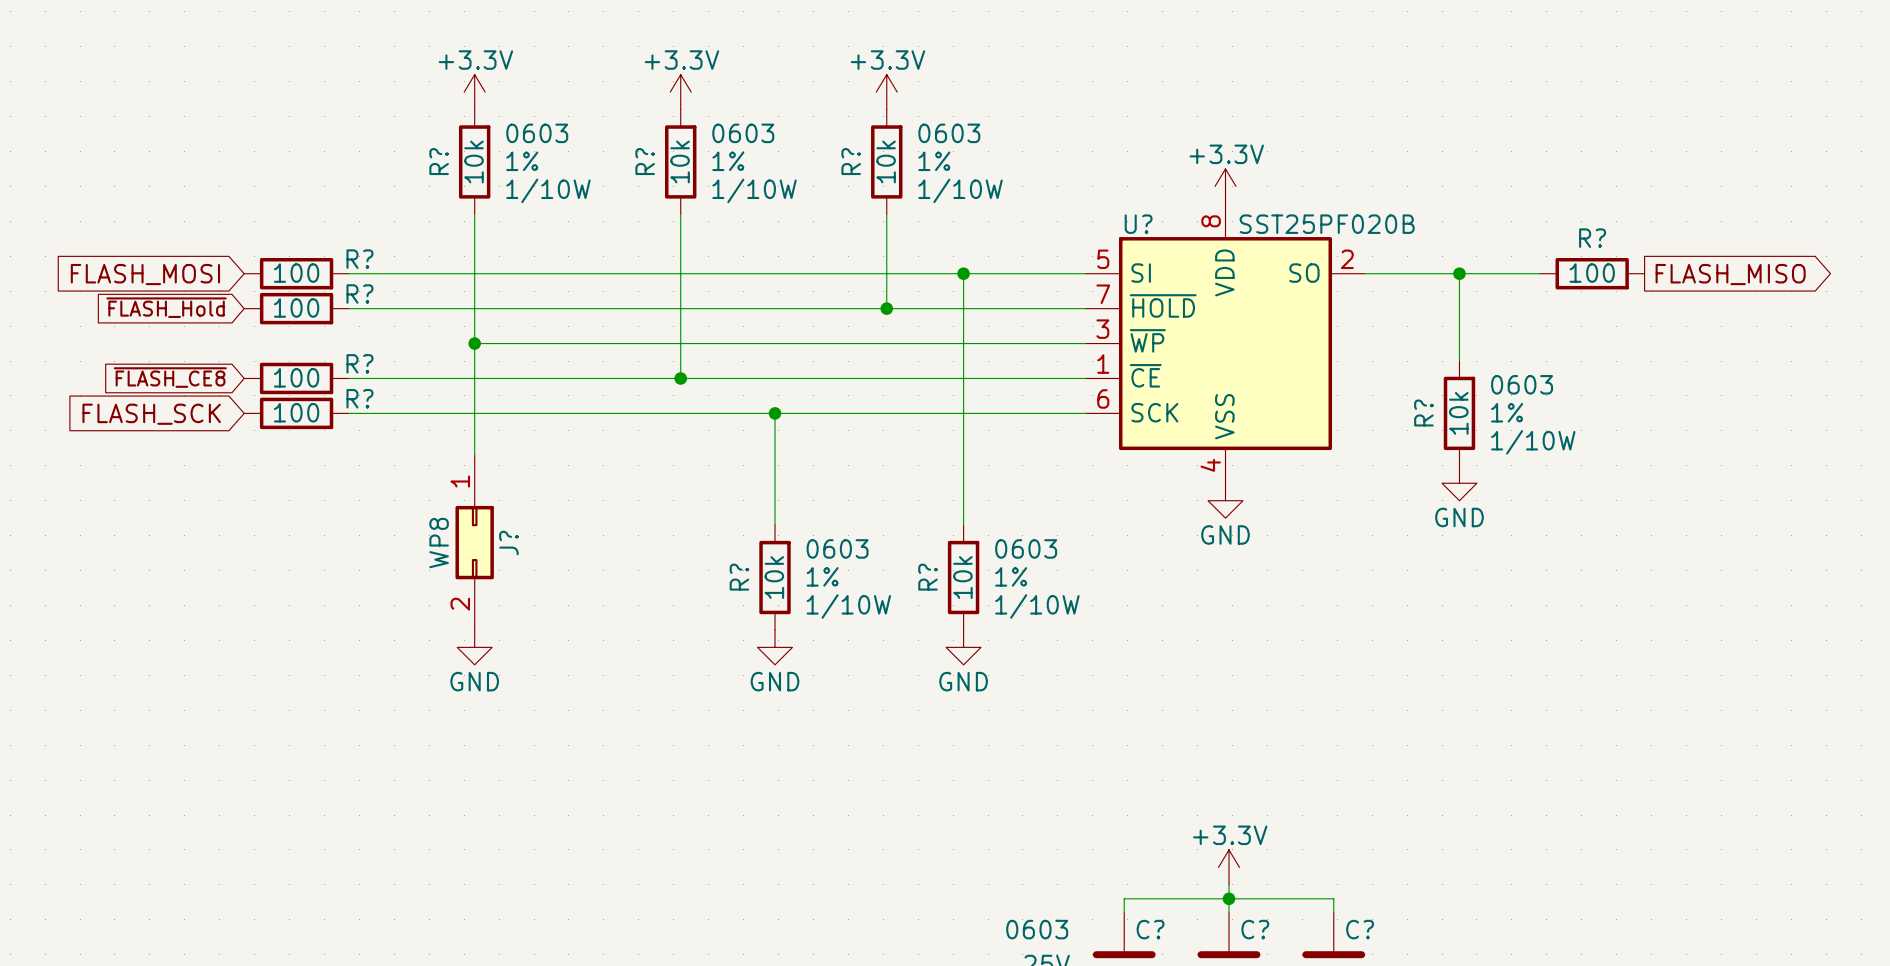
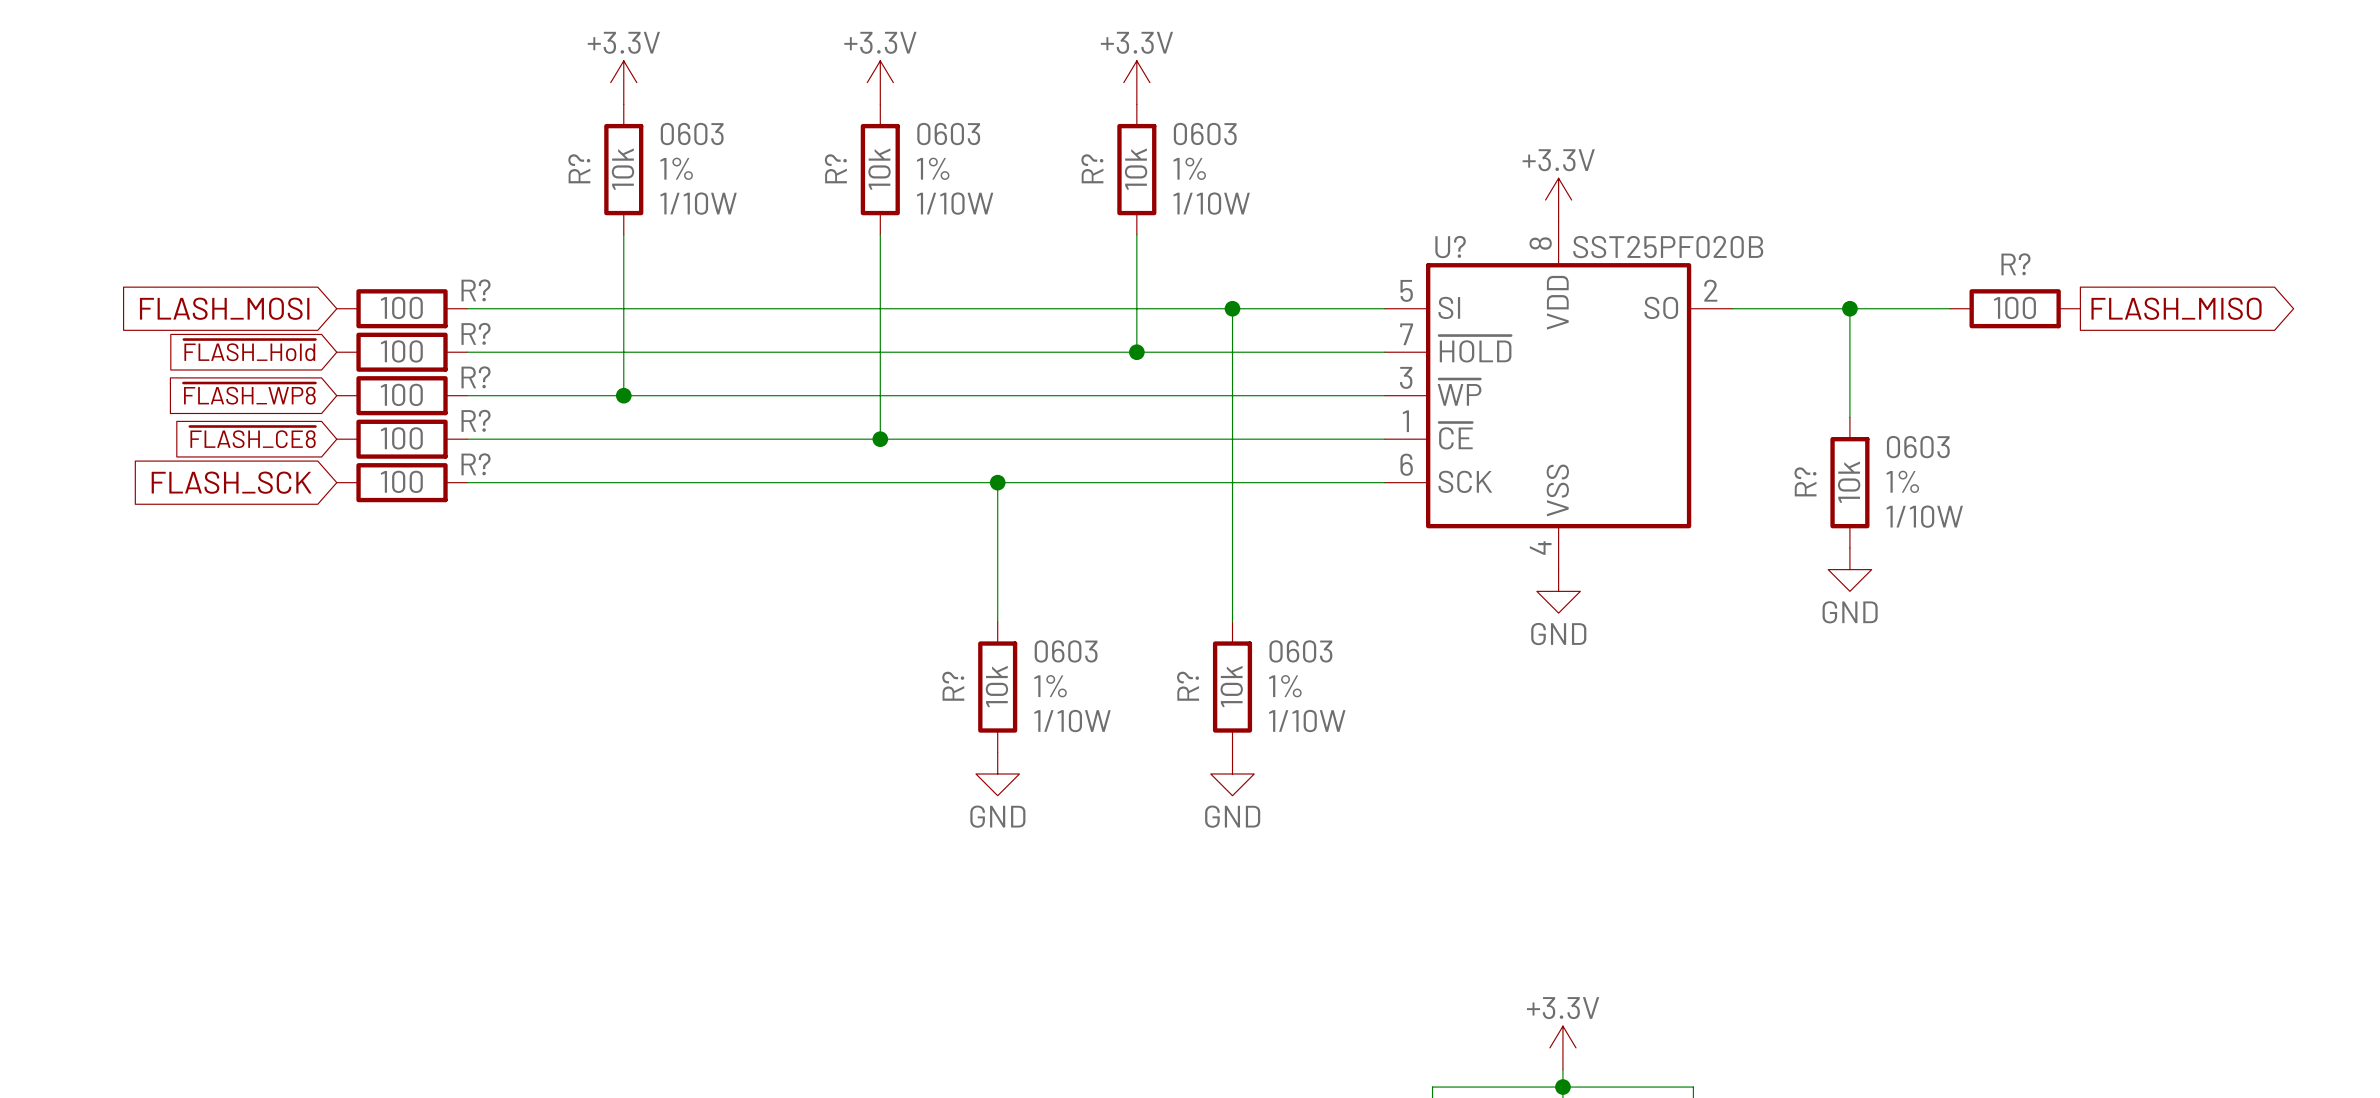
global label: none -> ~{FLASH_WP8} (249, 393)
R?: none -> 100 (402, 395)
wire: (474, 343) (474, 455) -> (623, 395) (467, 395)
J?: WP8 (474, 542) -> none
power symbol: GND (474, 647) -> none

